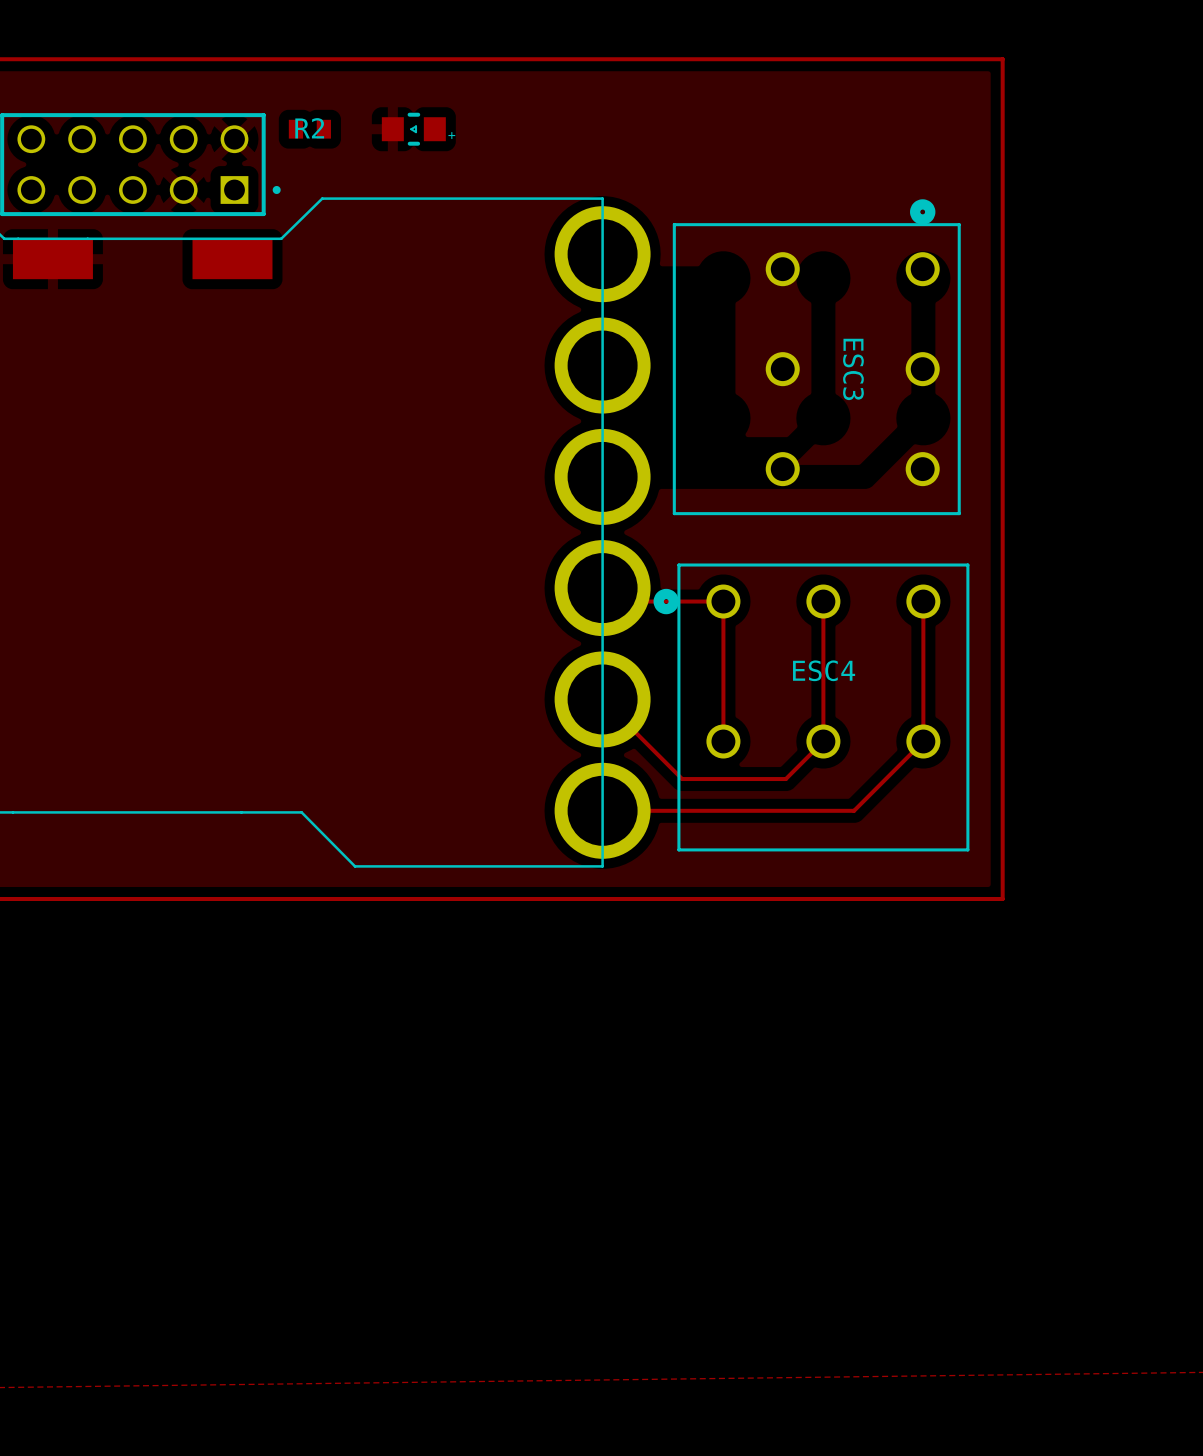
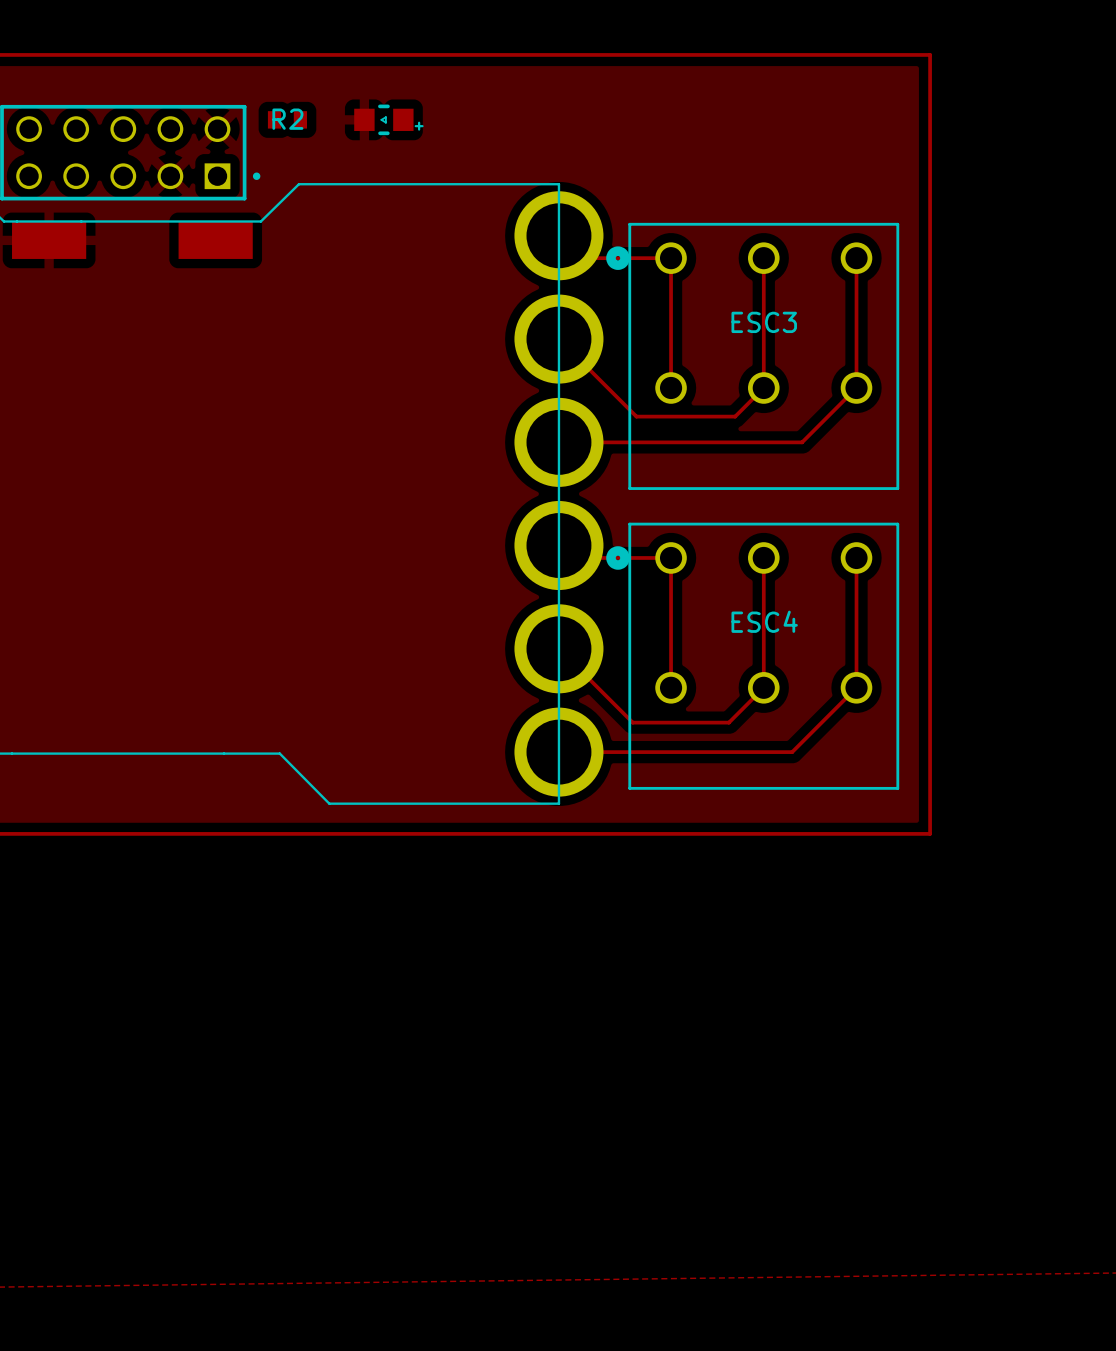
top track: none -> (581, 258) (671, 258) (671, 387)
top track: none -> (763, 258) (763, 387) (735, 416) (636, 416) (558, 339)
top track: none -> (856, 258) (856, 387) (802, 442) (558, 442)
ESC3 rotation: 0° (816, 357) -> 90° counterclockwise (752, 356)

